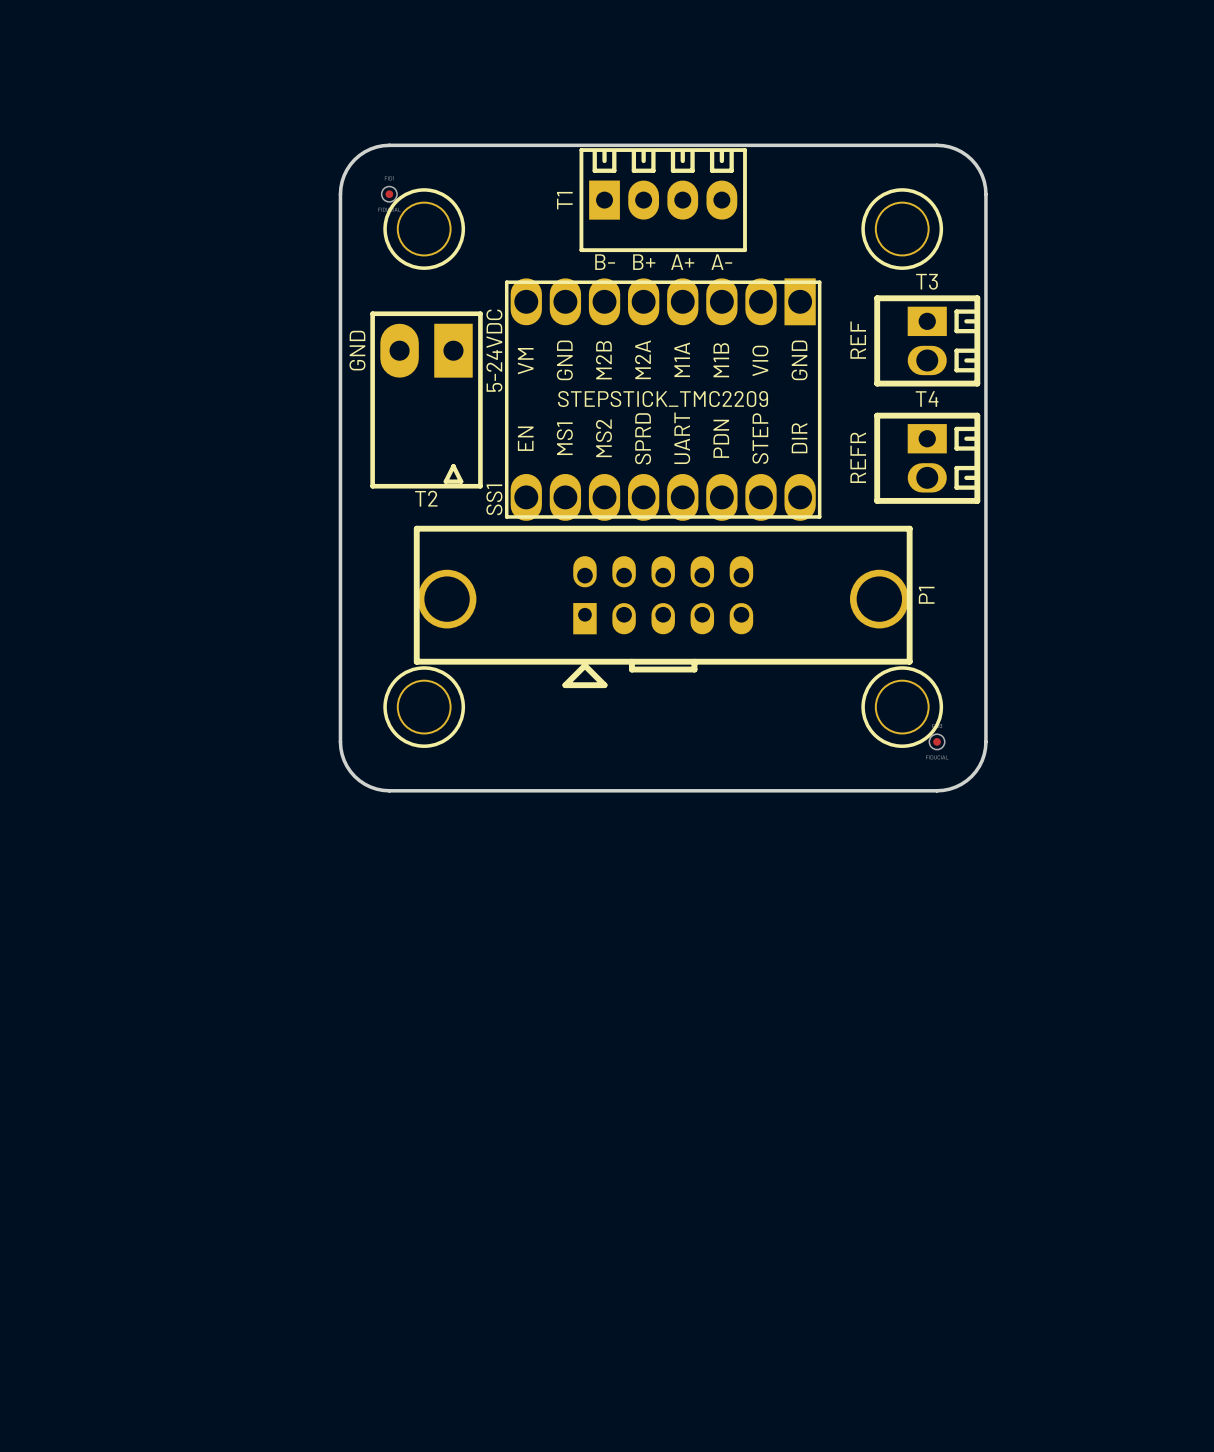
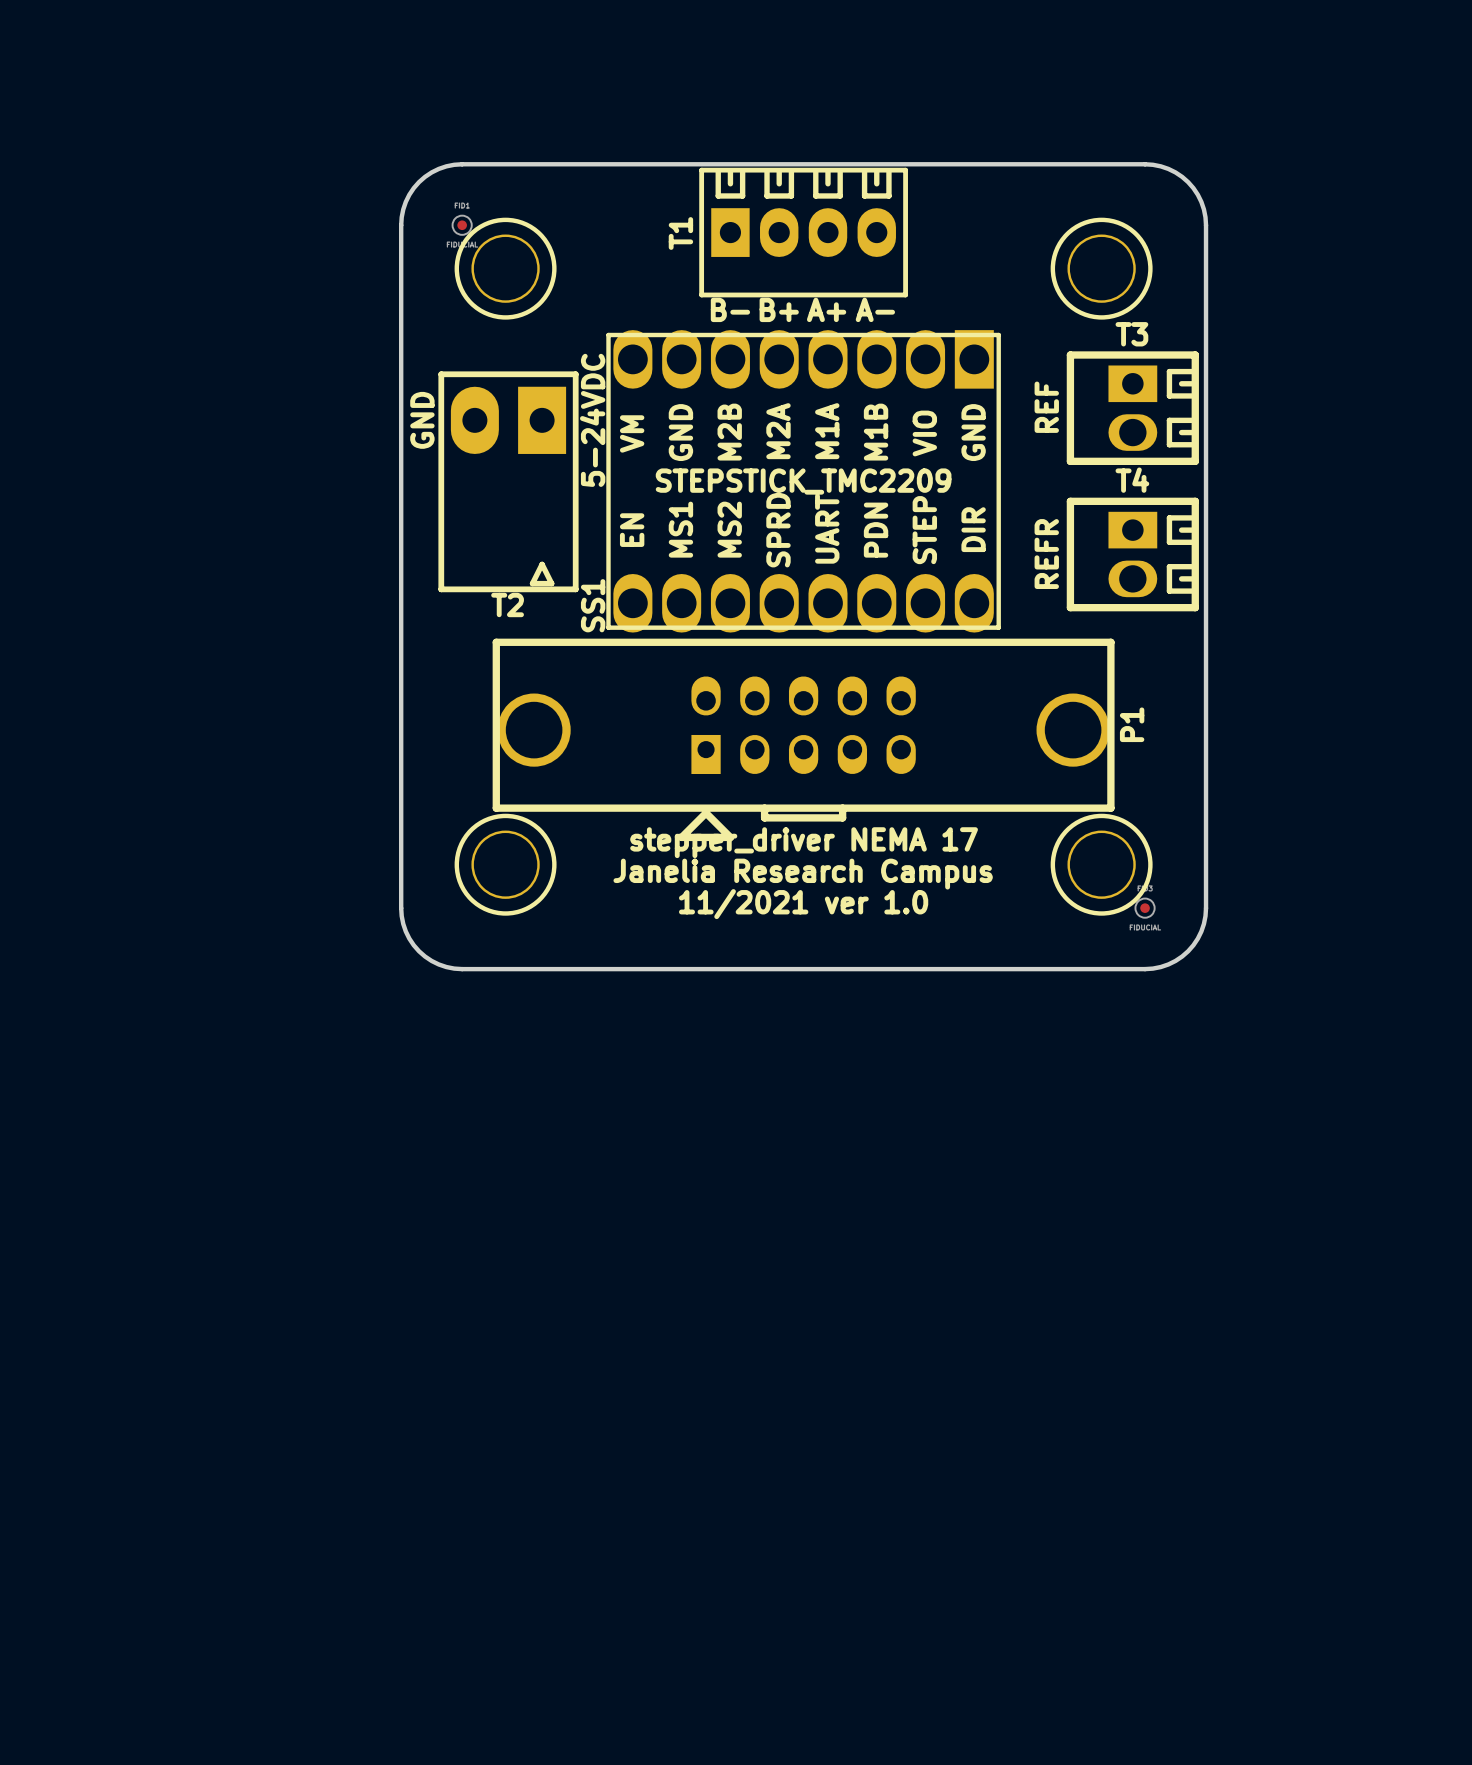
text: none -> stepper_driver NEMA 17 (804, 842)
text: none -> Janelia Research Campus (803, 874)
text: none -> 11/2021 ver 1.0 (803, 904)

